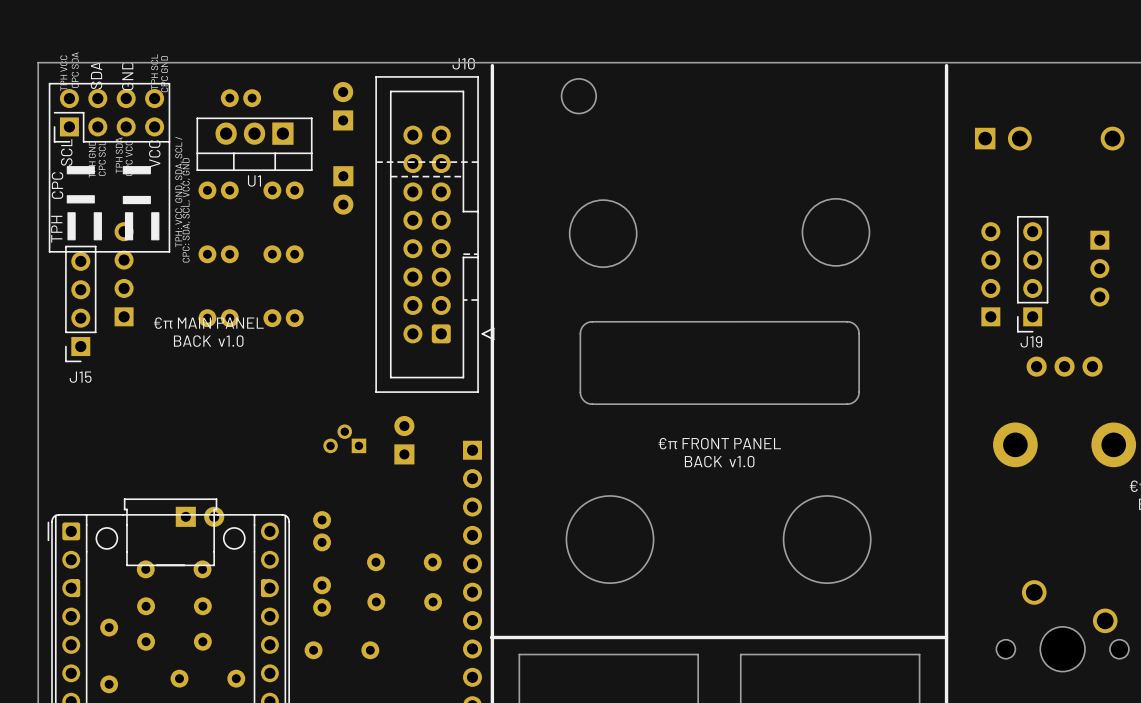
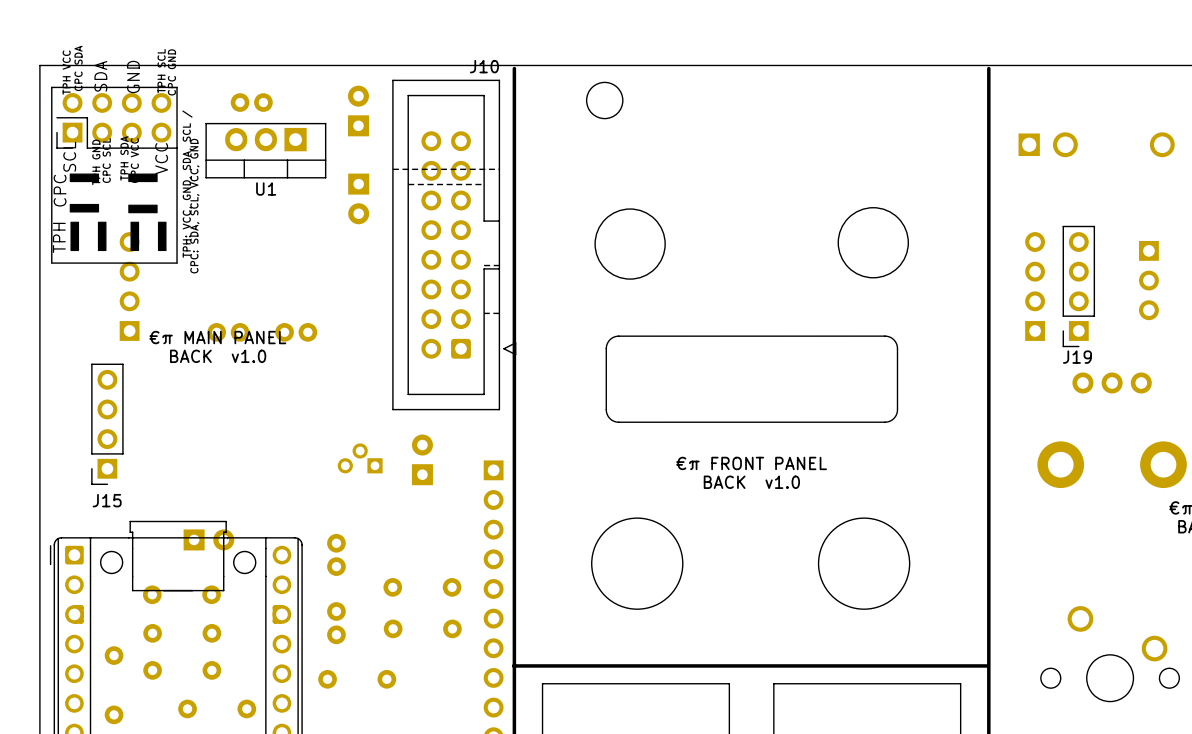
part: (218, 190) -> none
part: (283, 190) -> none
part: (218, 254) -> none
part: (283, 254) -> none
J15 position: (80, 303) -> (107, 424)

